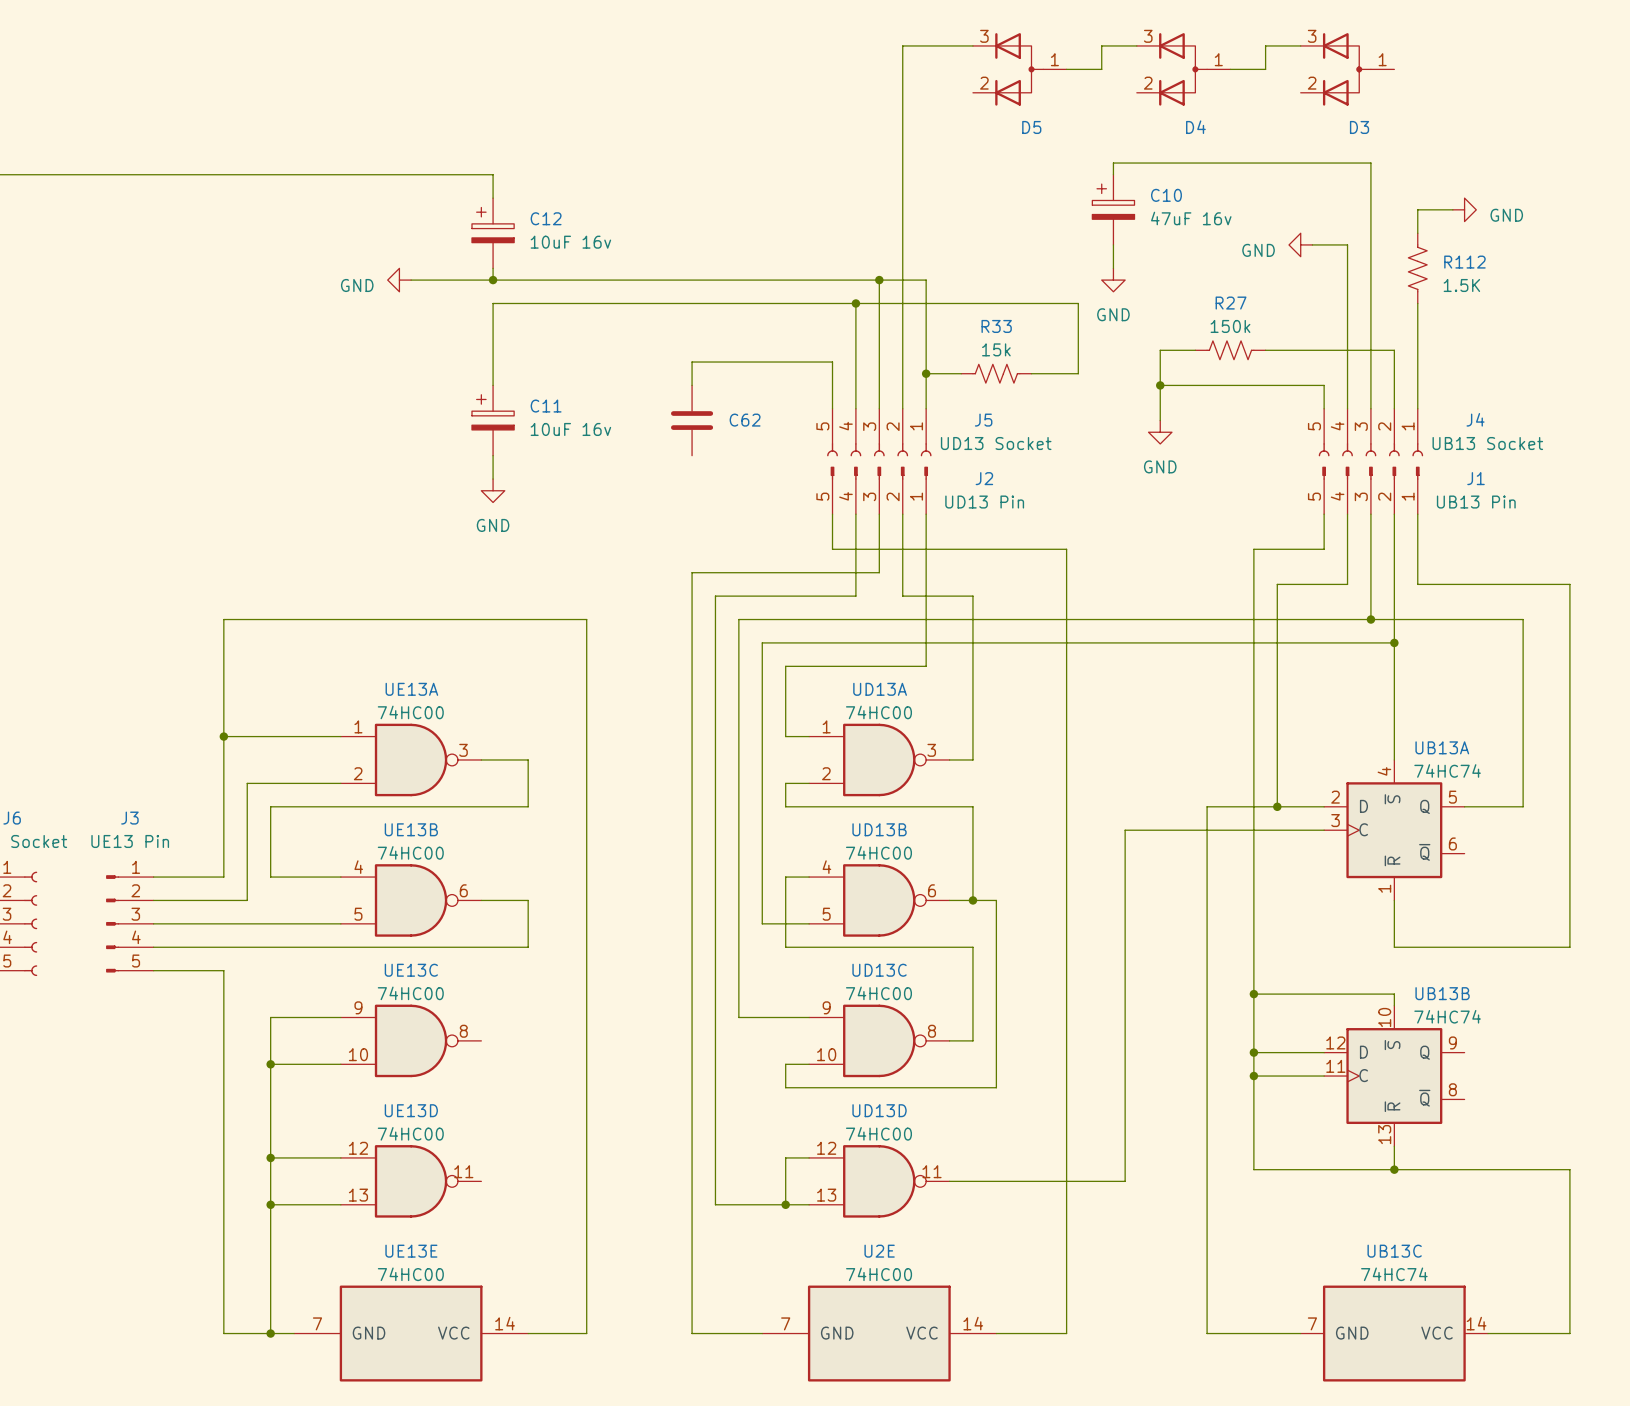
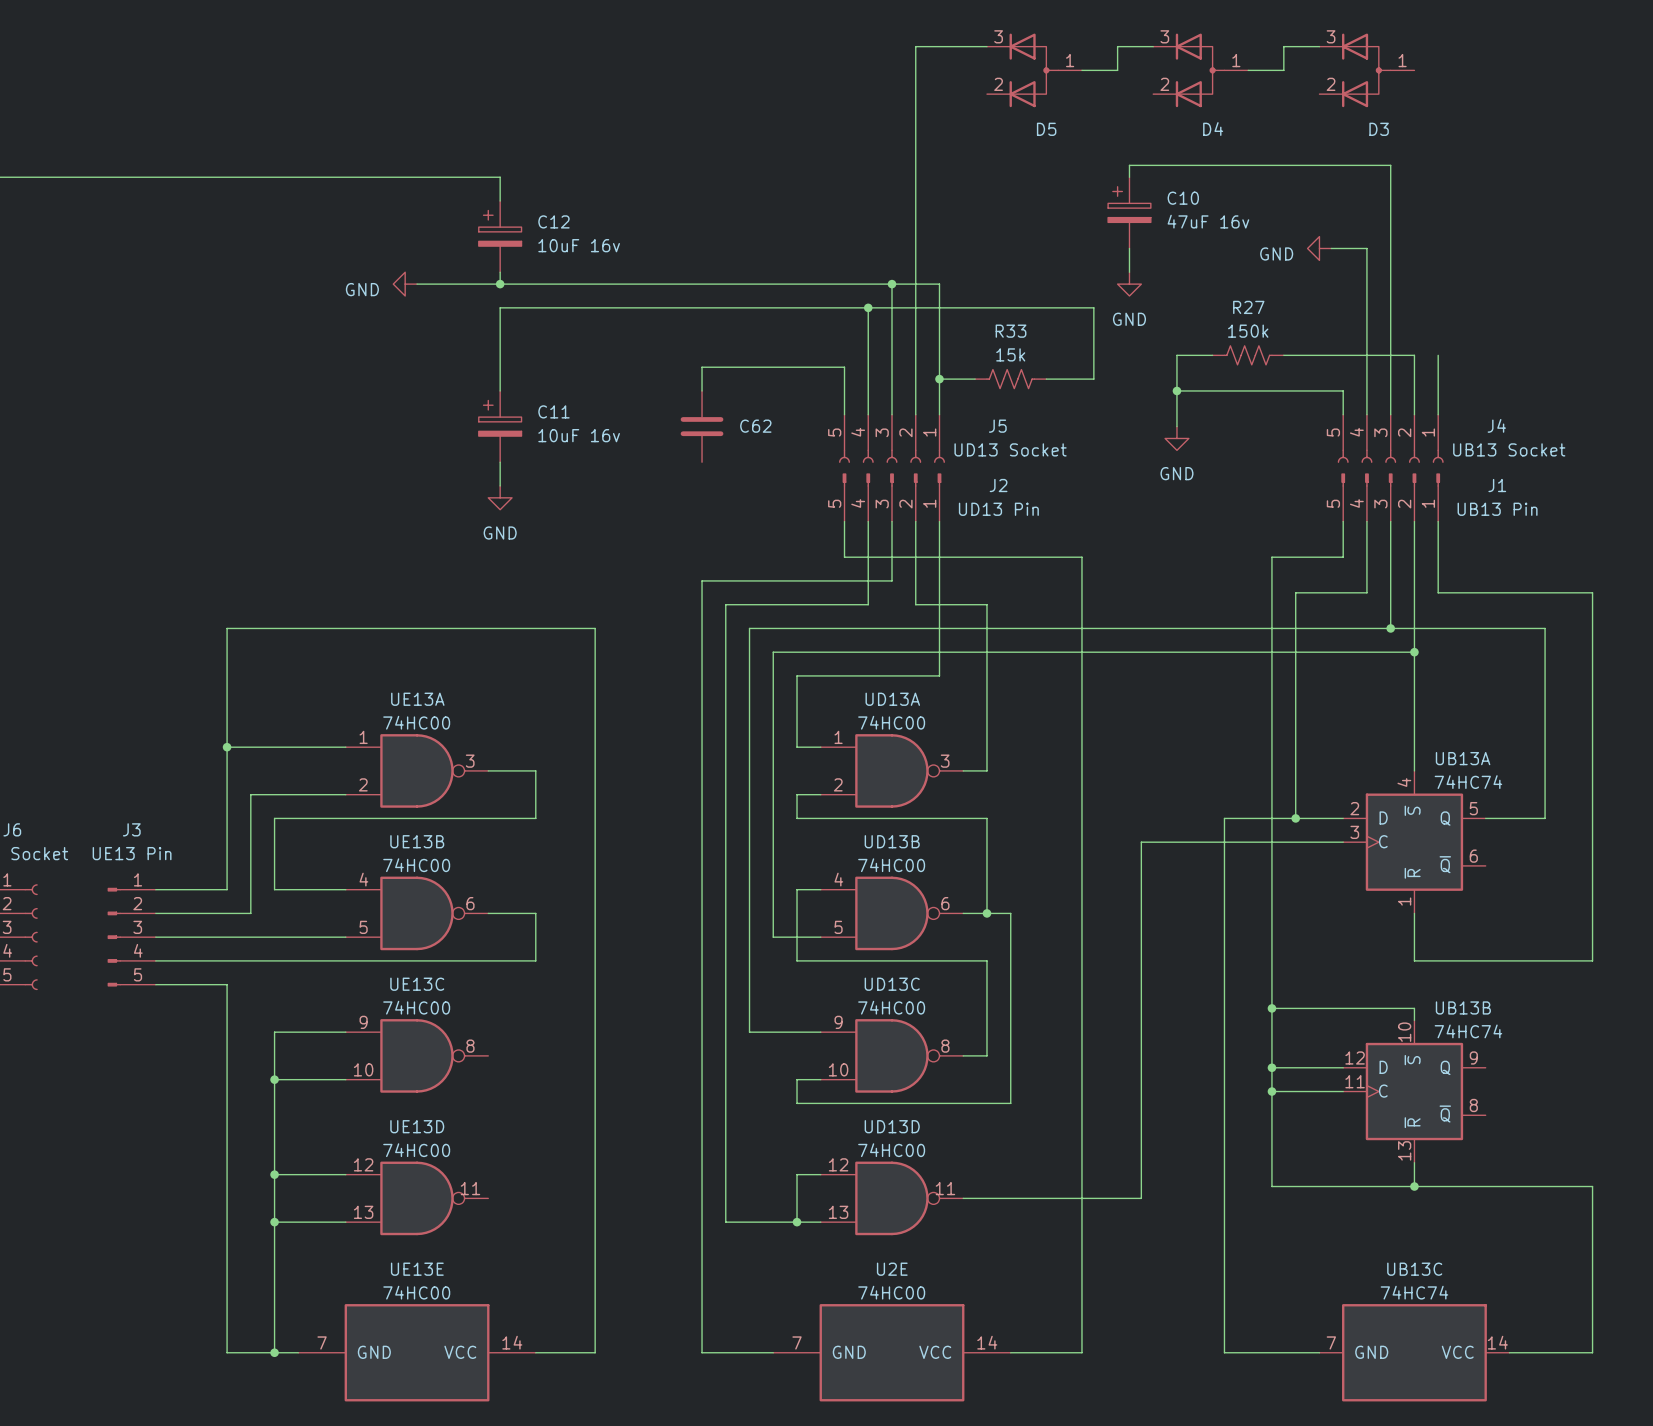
wire: (1452, 209) (1417, 209) (1417, 233) -> none
power symbol: GND (1464, 209) -> none
R112: 1.5K (1417, 268) -> none
wire: (1417, 303) (1417, 350) -> none

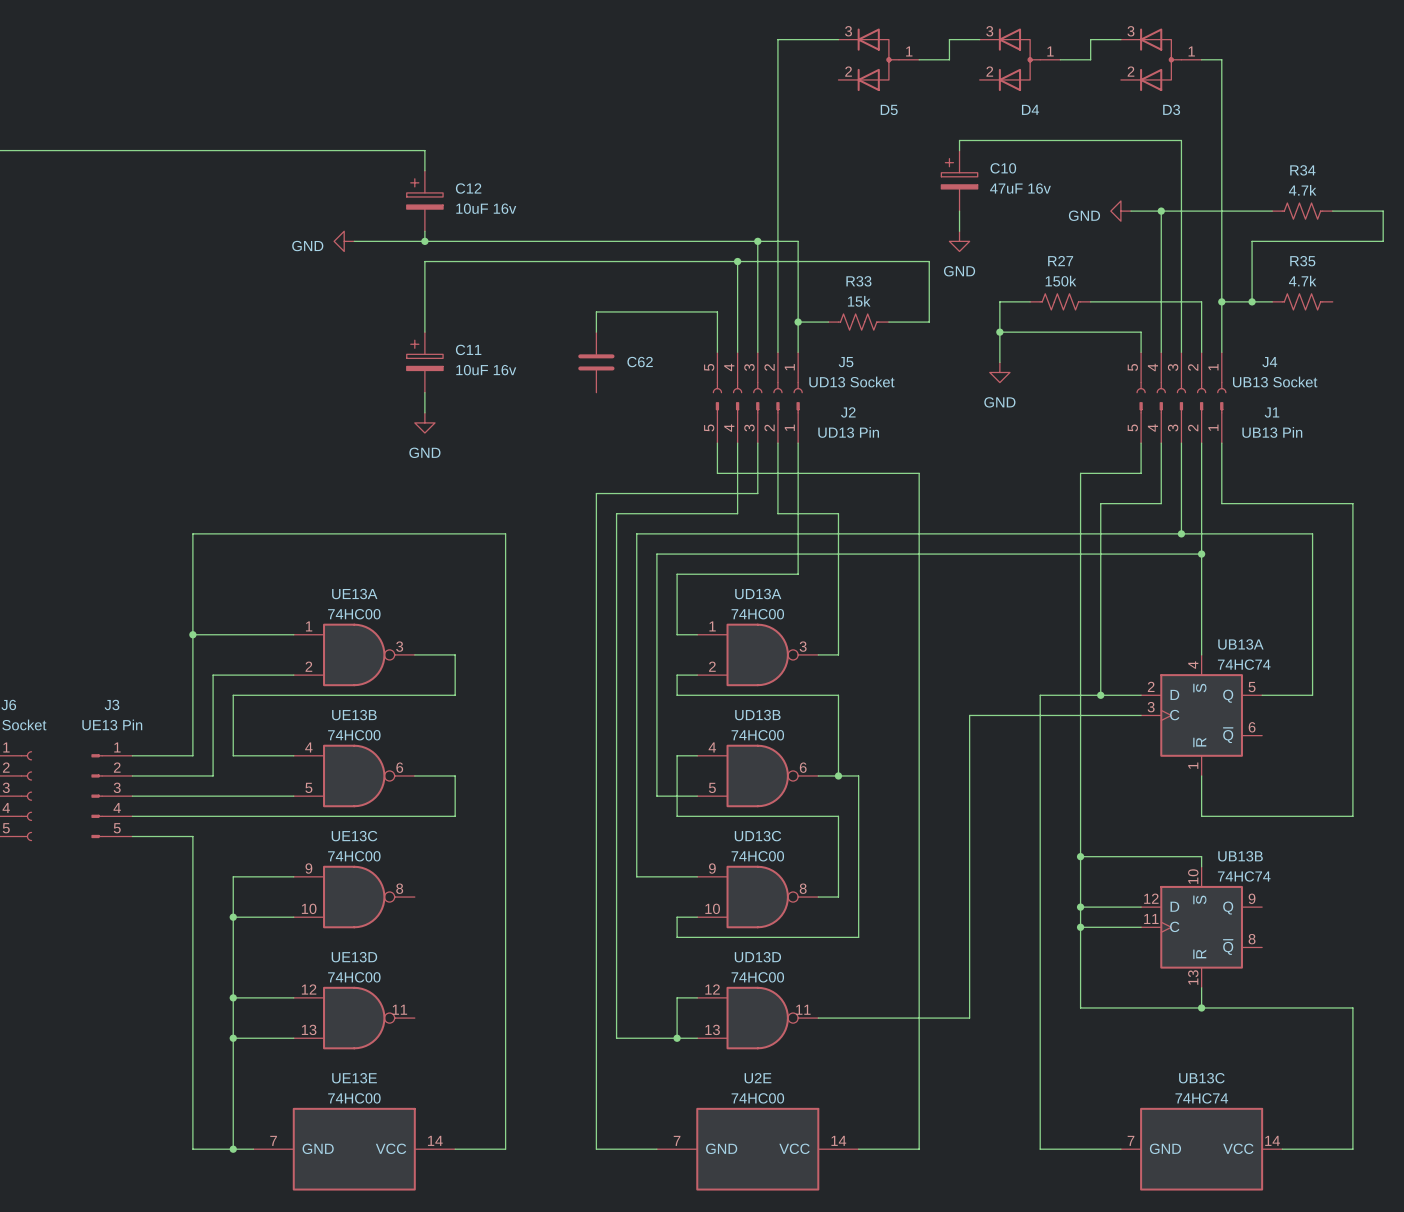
wire: none -> (1201, 59) (1221, 59) (1221, 301) (1272, 301)
wire: none -> (1161, 211) (1272, 211)
junction: none -> (1161, 211)
R34: none -> 4.7k (1302, 211)
wire: none -> (1332, 211) (1383, 211) (1383, 241) (1252, 241) (1252, 301)
junction: none -> (1221, 301)
junction: none -> (1252, 301)
R35: none -> 4.7k (1302, 301)

